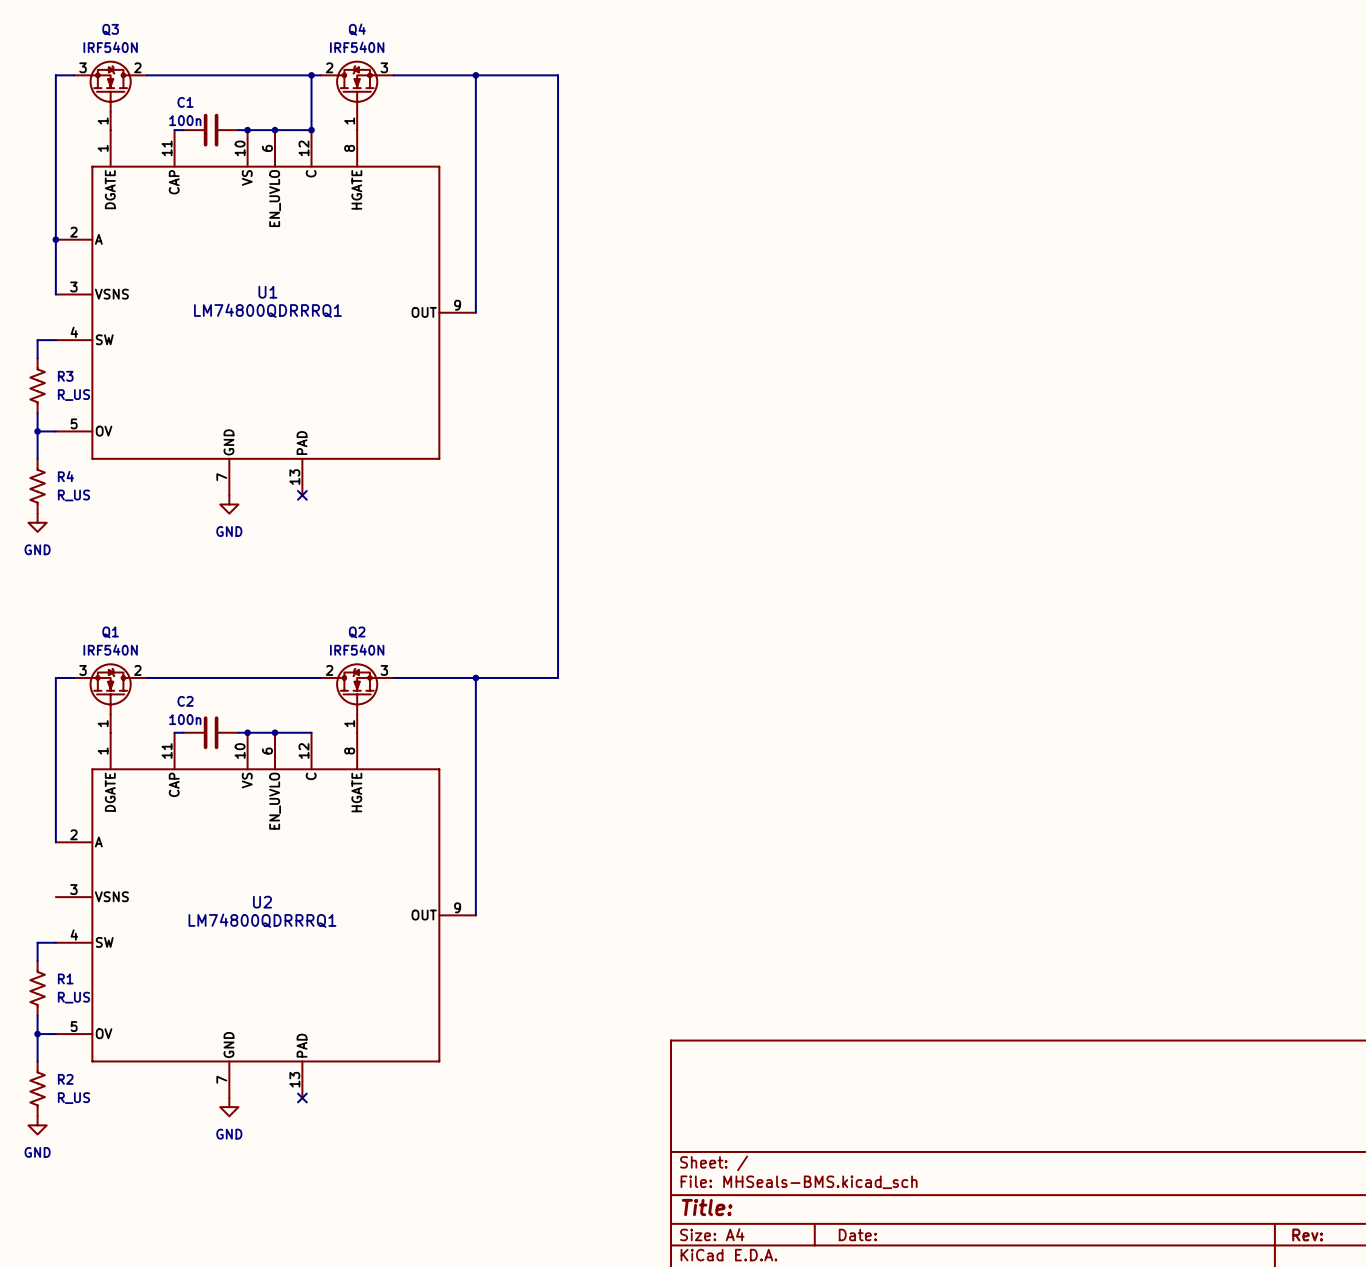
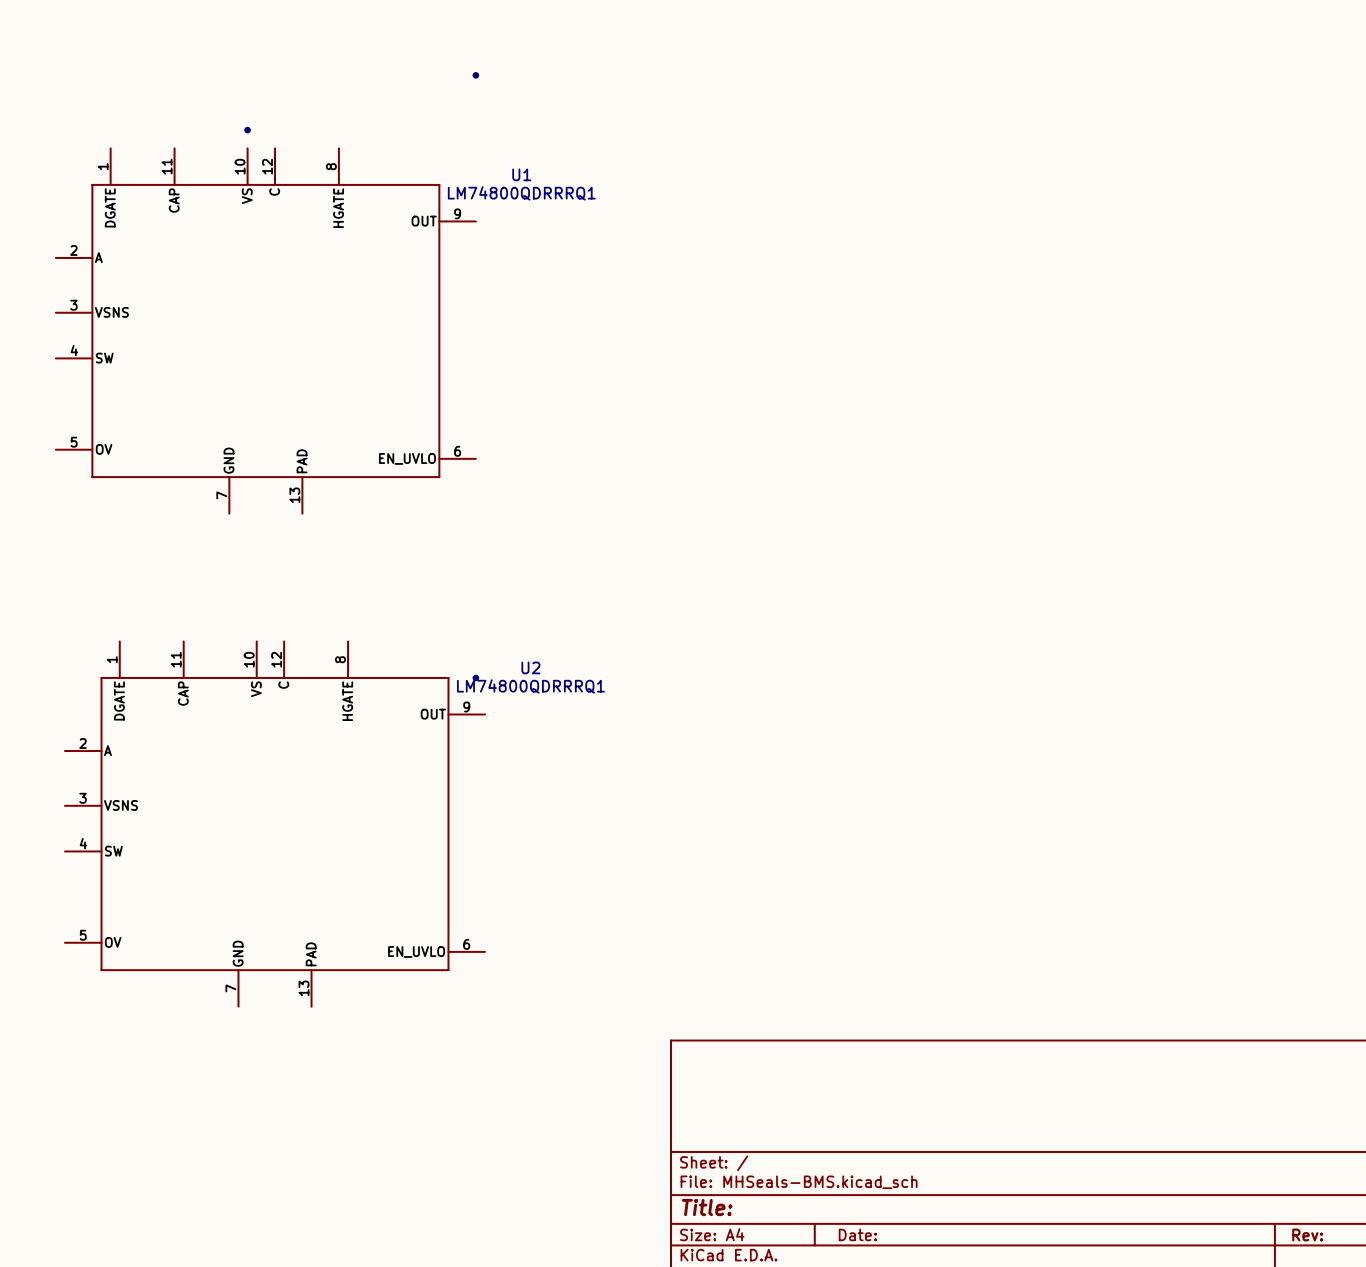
wire: (74, 75) (55, 75) (55, 294) -> none
wire: (147, 75) (320, 75) -> none
wire: (311, 75) (311, 130) (238, 130) -> none
junction: (311, 75) -> none
wire: (393, 75) (558, 75) (558, 677) (393, 677) -> none
wire: (475, 75) (475, 312) -> none
Q3: IRF540N (110, 95) -> none
Q4: IRF540N (357, 95) -> none
U1 symbol: [55, 130, 476, 496] -> [55, 148, 476, 514]
wire: (174, 130) (183, 130) -> none
C1: 100n (211, 130) -> none
junction: (274, 130) -> none
junction: (311, 130) -> none
junction: (55, 239) -> none
U1 name position: U1 (267, 292) -> U1 (521, 174)
U1 value position: LM74800QDRRRQ1 (267, 310) -> LM74800QDRRRQ1 (521, 193)
wire: (55, 340) (37, 340) (37, 358) -> none
R3: R_US (37, 385) -> none
wire: (37, 413) (37, 458) -> none
wire: (37, 431) (55, 431) -> none
junction: (37, 431) -> none
R4: R_US (37, 486) -> none
no-connect mark: (302, 495) -> none
power symbol: GND (229, 504) -> none
power symbol: GND (37, 522) -> none
wire: (74, 677) (55, 677) (55, 842) -> none
wire: (475, 677) (475, 915) -> none
Q1: IRF540N (110, 698) -> none
Q2: IRF540N (357, 698) -> none
U2 symbol: [55, 732, 476, 1098] -> [64, 641, 486, 1007]
wire: (174, 732) (183, 732) -> none
C2: 100n (211, 732) -> none
wire: (238, 732) (311, 732) -> none
junction: (247, 732) -> none
junction: (274, 732) -> none
U2 name position: U2 (262, 902) -> U2 (530, 667)
U2 value position: LM74800QDRRRQ1 (262, 920) -> LM74800QDRRRQ1 (530, 686)
wire: (55, 942) (37, 942) (37, 961) -> none
R1: R_US (37, 988) -> none
wire: (37, 1015) (37, 1061) -> none
wire: (37, 1034) (55, 1034) -> none
junction: (37, 1034) -> none
R2: R_US (37, 1088) -> none
no-connect mark: (302, 1097) -> none
power symbol: GND (229, 1107) -> none
power symbol: GND (37, 1125) -> none

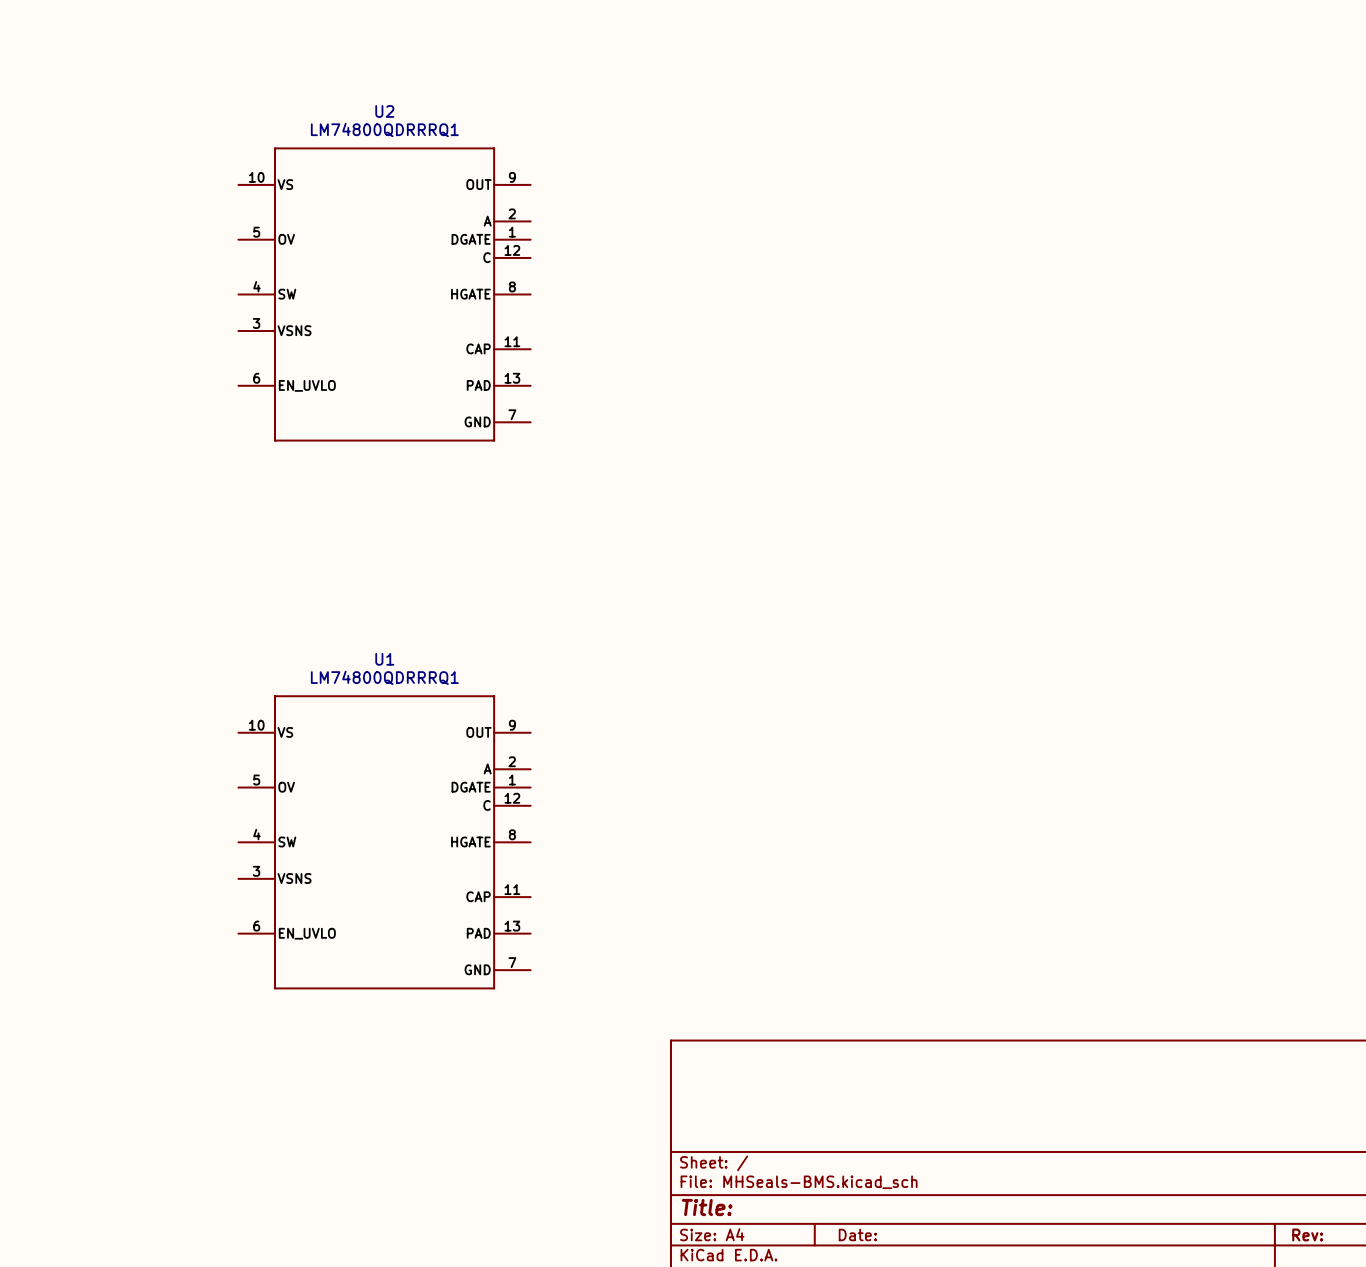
junction: (475, 75) -> none
junction: (247, 130) -> none
U1 symbol: [55, 148, 476, 514] -> [238, 695, 531, 990]
U1 name position: U1 (521, 174) -> U1 (384, 659)
U1 value position: LM74800QDRRRQ1 (521, 193) -> LM74800QDRRRQ1 (384, 677)
U2 symbol: [64, 641, 486, 1007] -> [238, 147, 531, 442]
U2 name position: U2 (530, 667) -> U2 (384, 111)
junction: (475, 677) -> none
U2 value position: LM74800QDRRRQ1 (530, 686) -> LM74800QDRRRQ1 (384, 129)

